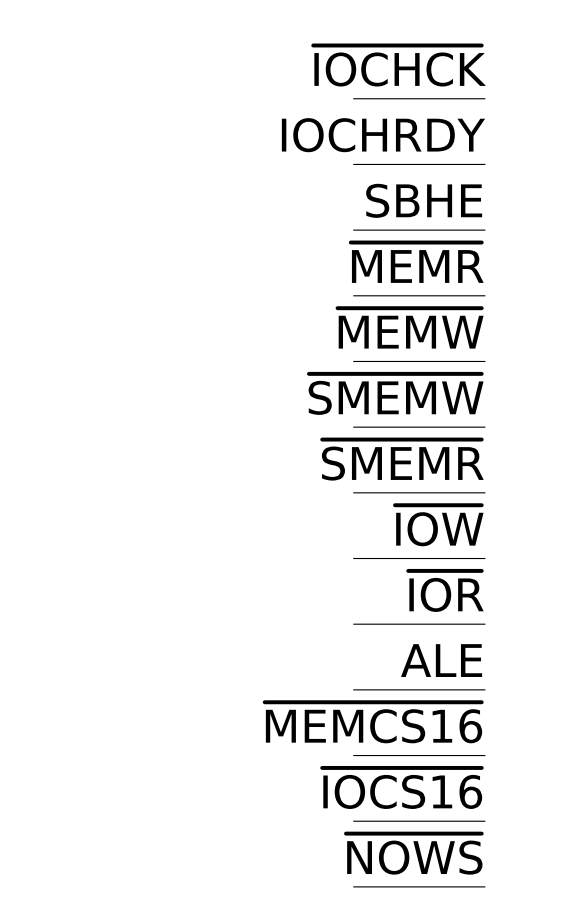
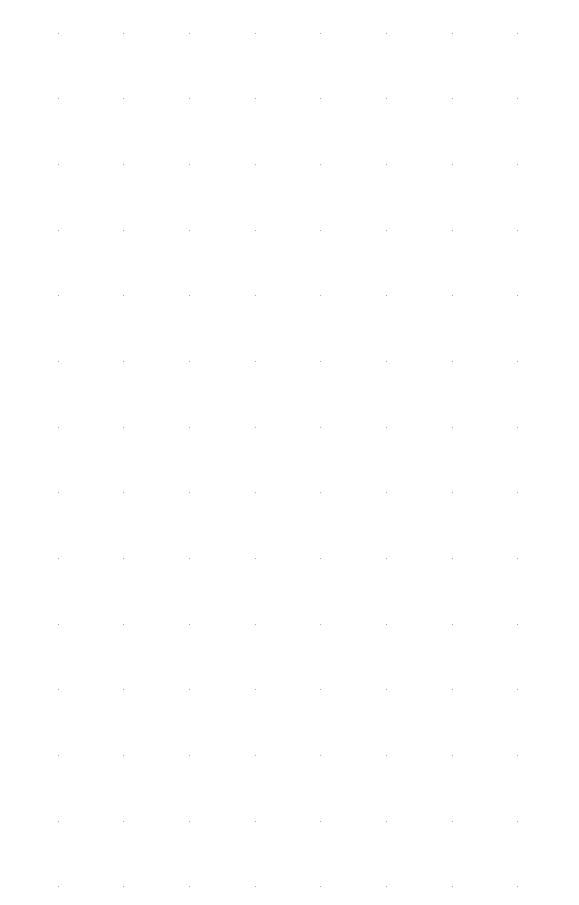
label: ~{IOCHCK} (399, 66) -> none
wire: (353, 98) (485, 98) -> none
label: IOCHRDY (383, 135) -> none
wire: (353, 164) (485, 164) -> none
label: SBHE (424, 200) -> none
wire: (353, 230) (485, 230) -> none
label: ~{MEMR} (417, 262) -> none
wire: (353, 295) (485, 295) -> none
label: ~{MEMW} (410, 328) -> none
wire: (353, 361) (485, 361) -> none
label: ~{SMEMW} (396, 394) -> none
wire: (353, 427) (485, 427) -> none
label: ~{SMEMR} (402, 460) -> none
wire: (353, 492) (485, 492) -> none
label: ~{IOW} (439, 525) -> none
wire: (353, 558) (485, 558) -> none
label: ~{IOR} (445, 591) -> none
wire: (353, 624) (485, 624) -> none
label: ALE (441, 660) -> none
wire: (353, 689) (485, 689) -> none
label: ~{MEMCS16} (373, 722) -> none
wire: (353, 755) (485, 755) -> none
label: ~{IOCS16} (402, 788) -> none
wire: (353, 821) (485, 821) -> none
label: ~{NOWS} (414, 854) -> none
wire: (353, 886) (485, 886) -> none

